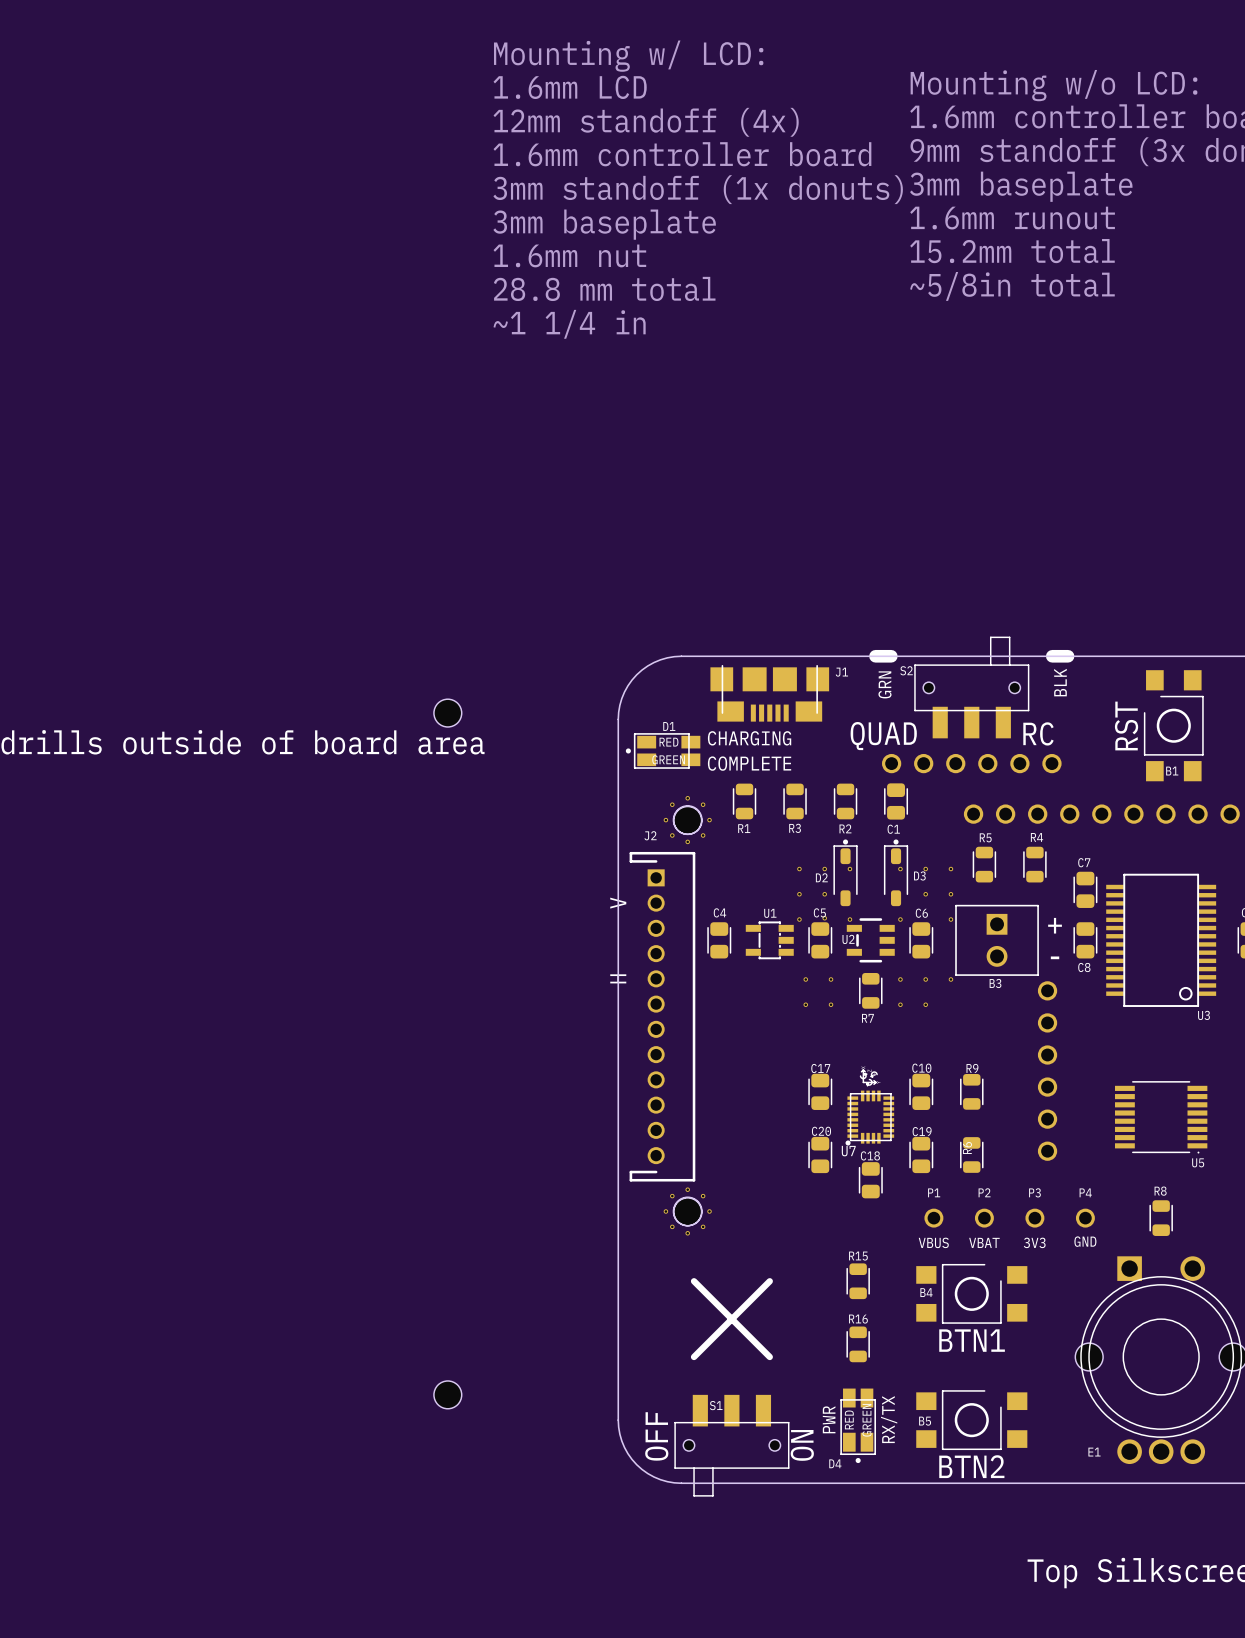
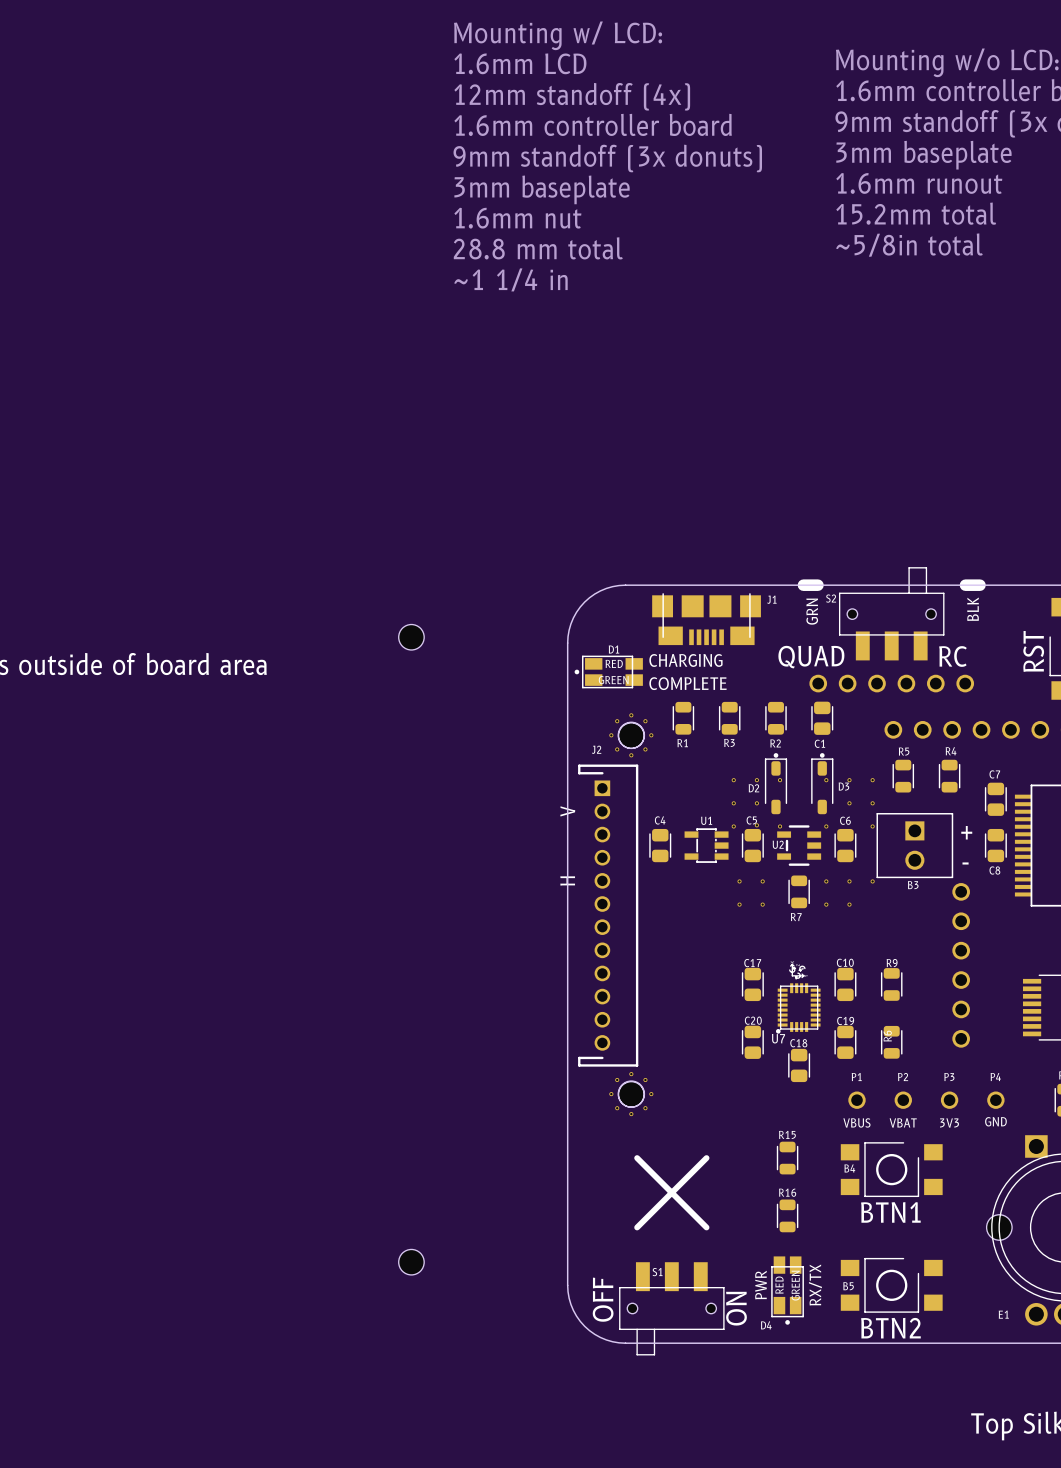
text: 3mm standoff (1x donuts) (698, 189) -> 9mm standoff (3x donuts) (607, 158)

